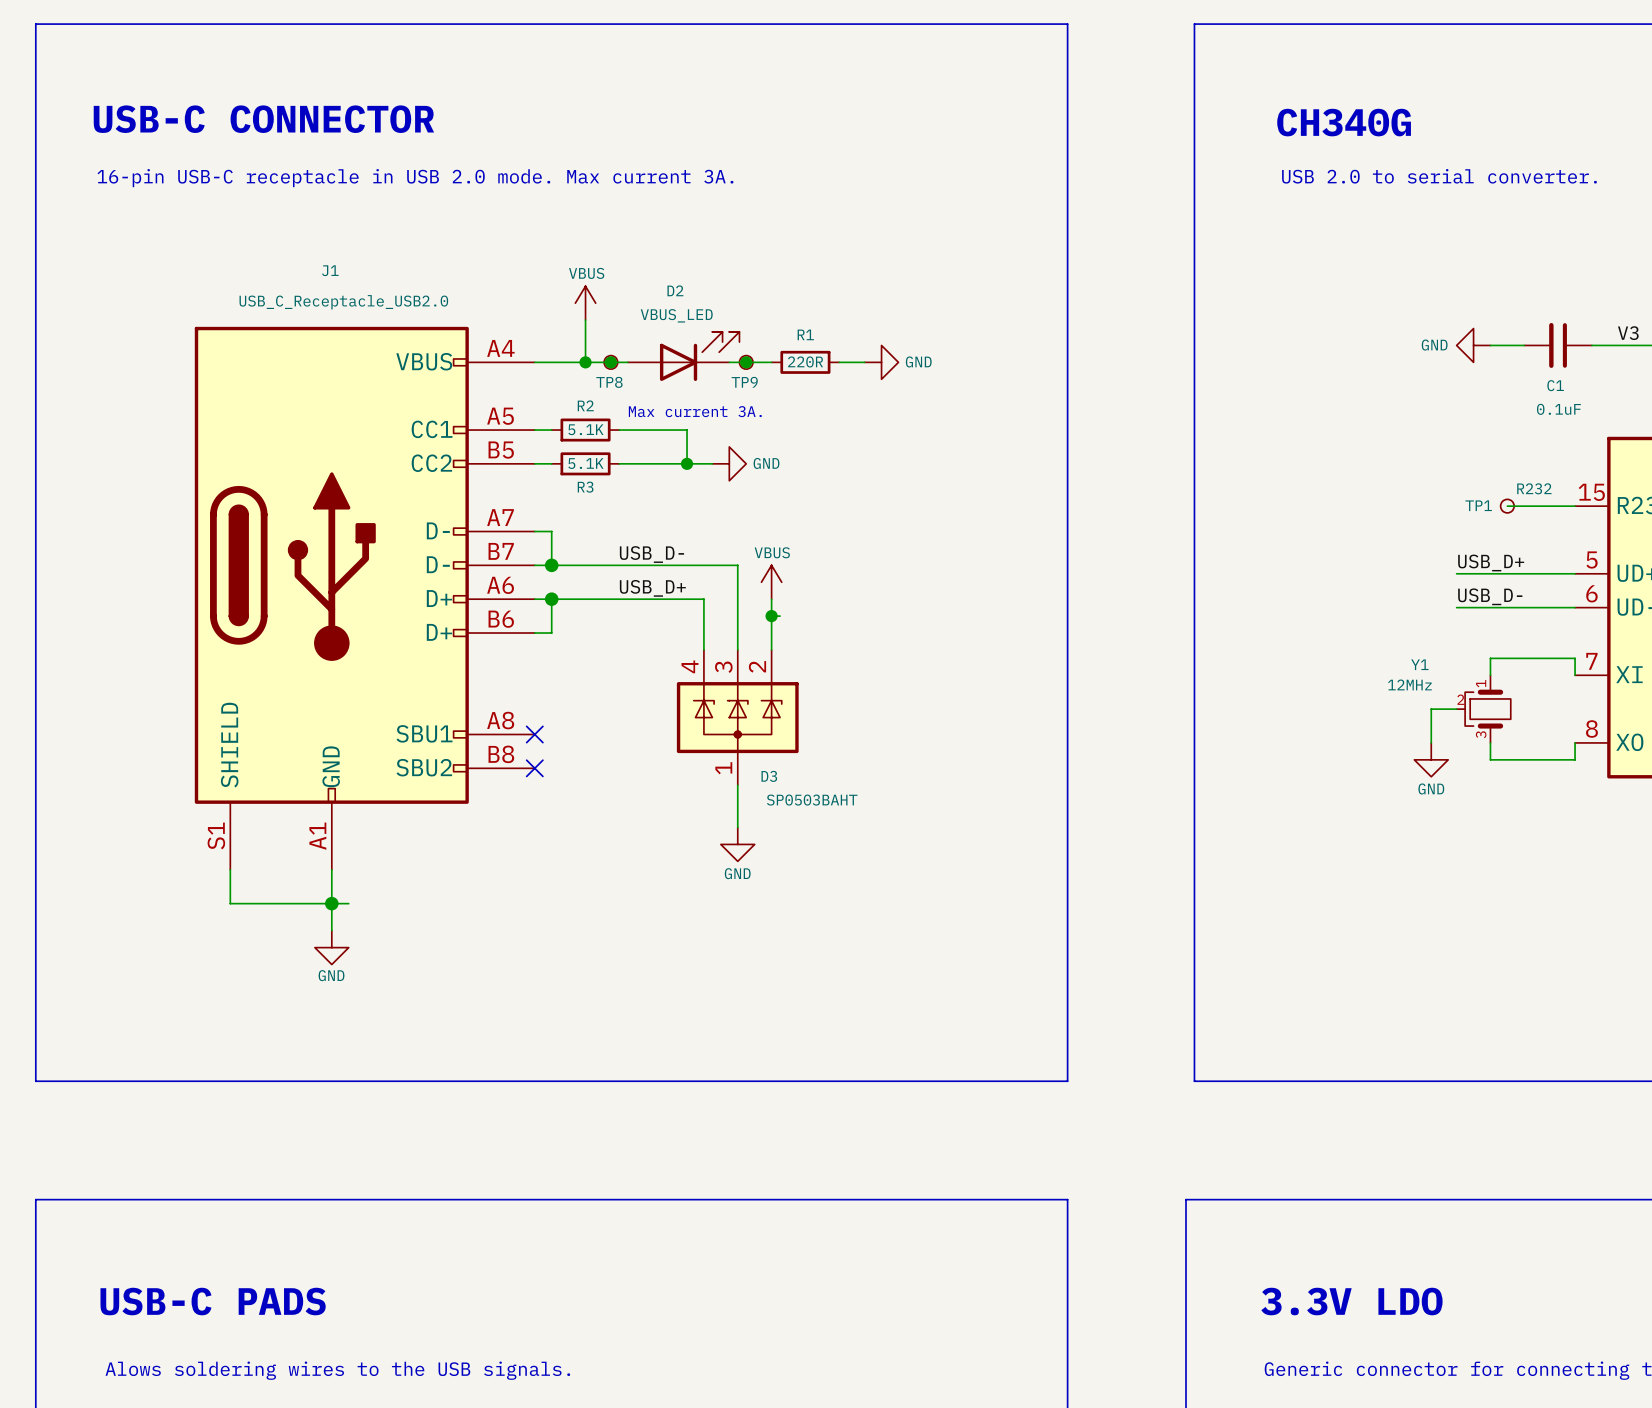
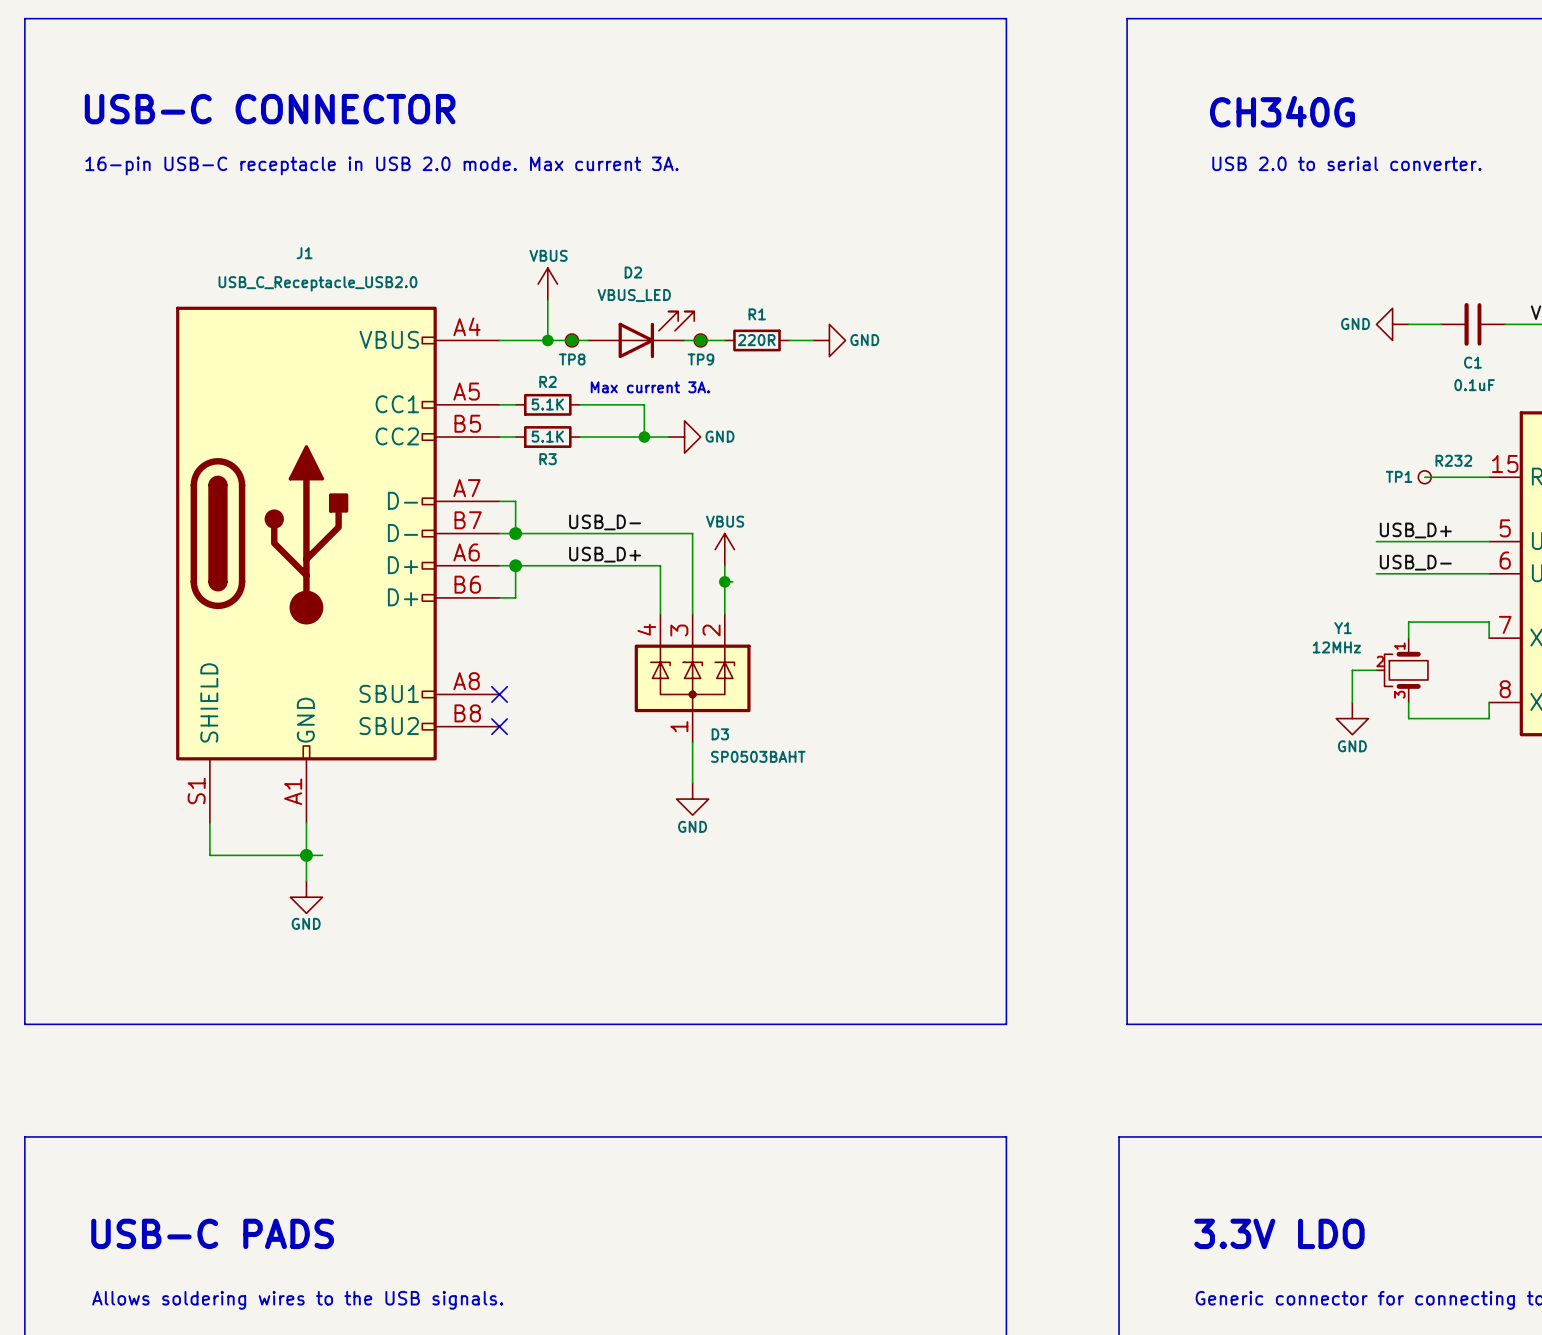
text: Alows soldering wires to the USB signals. (337, 1370) -> Allows soldering wires to the USB signals. (297, 1300)

